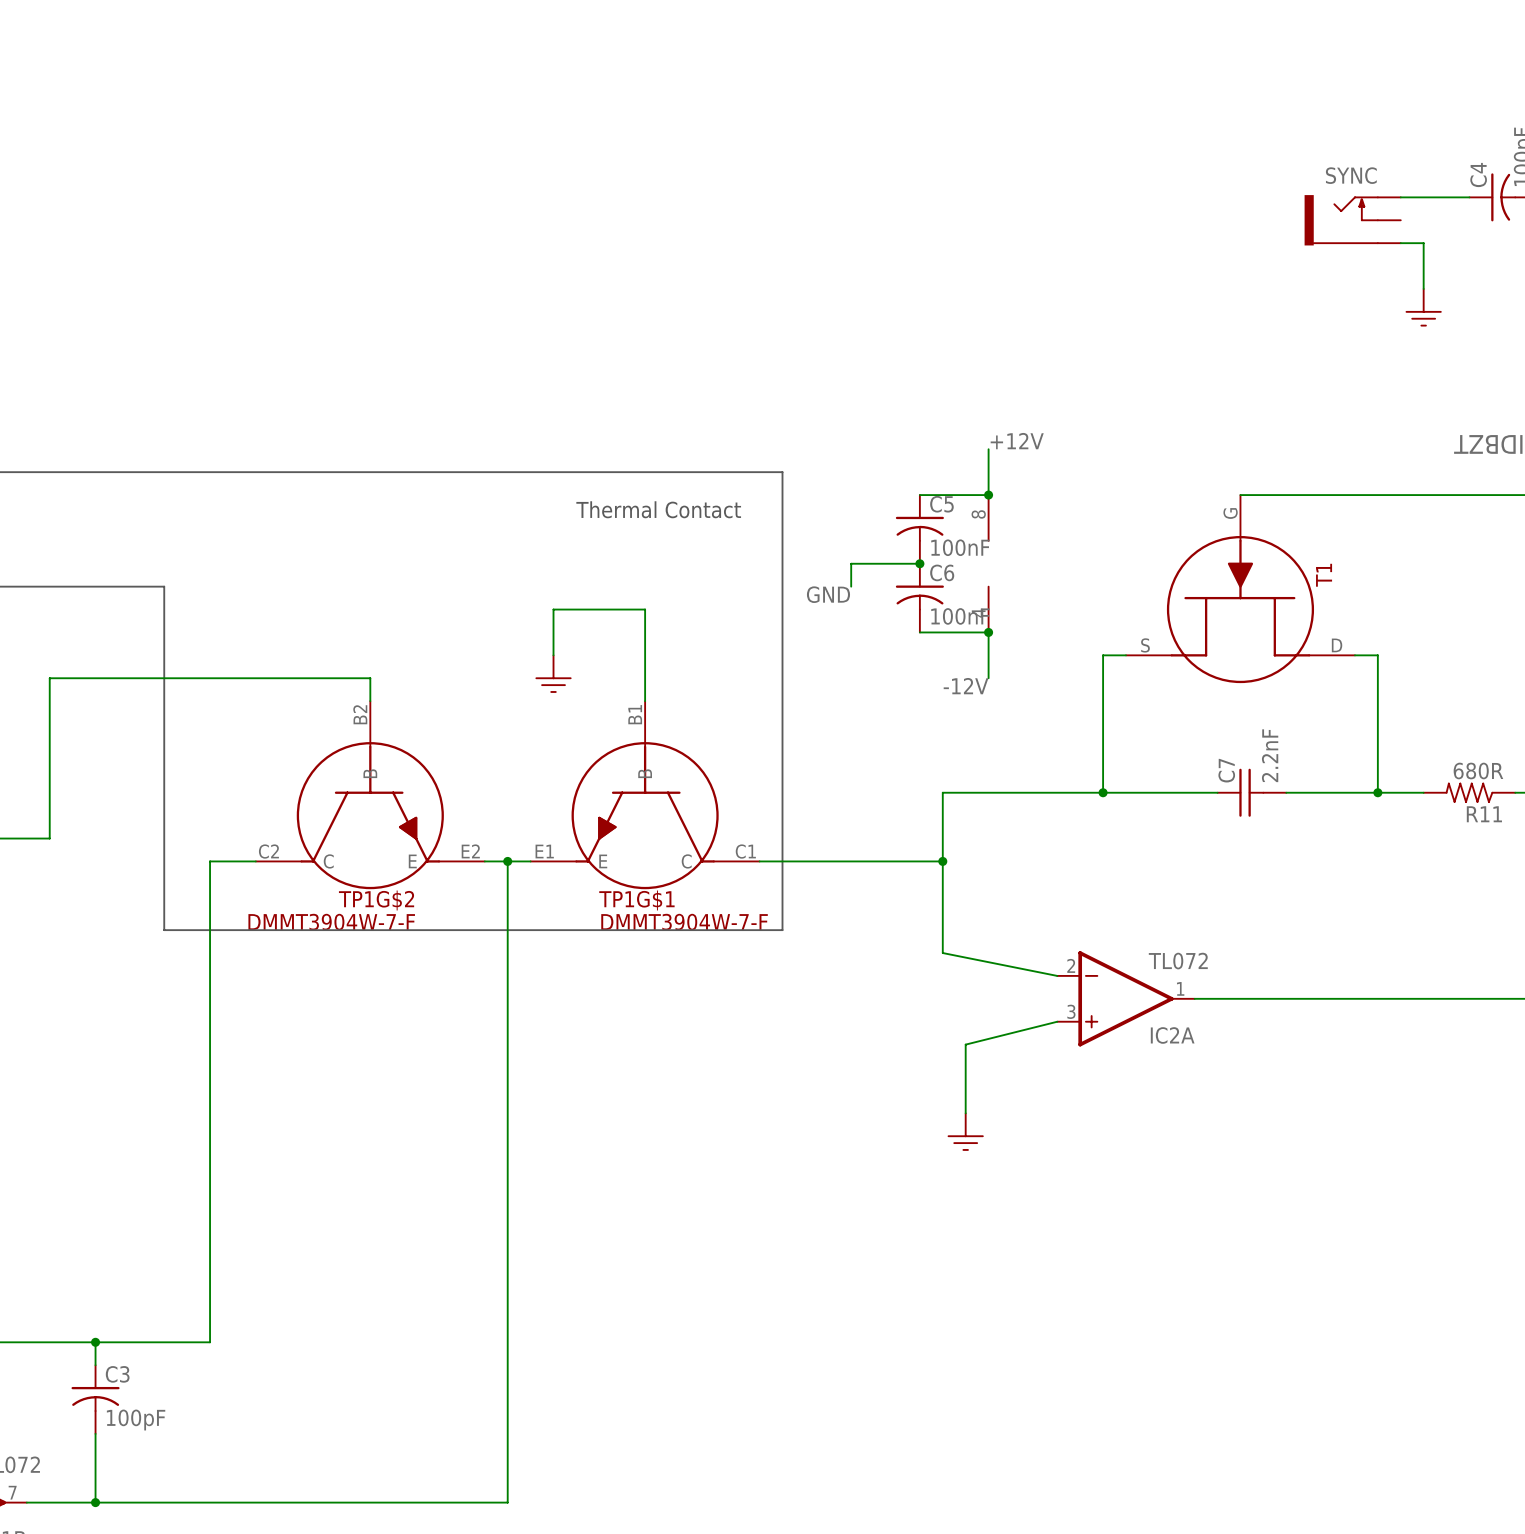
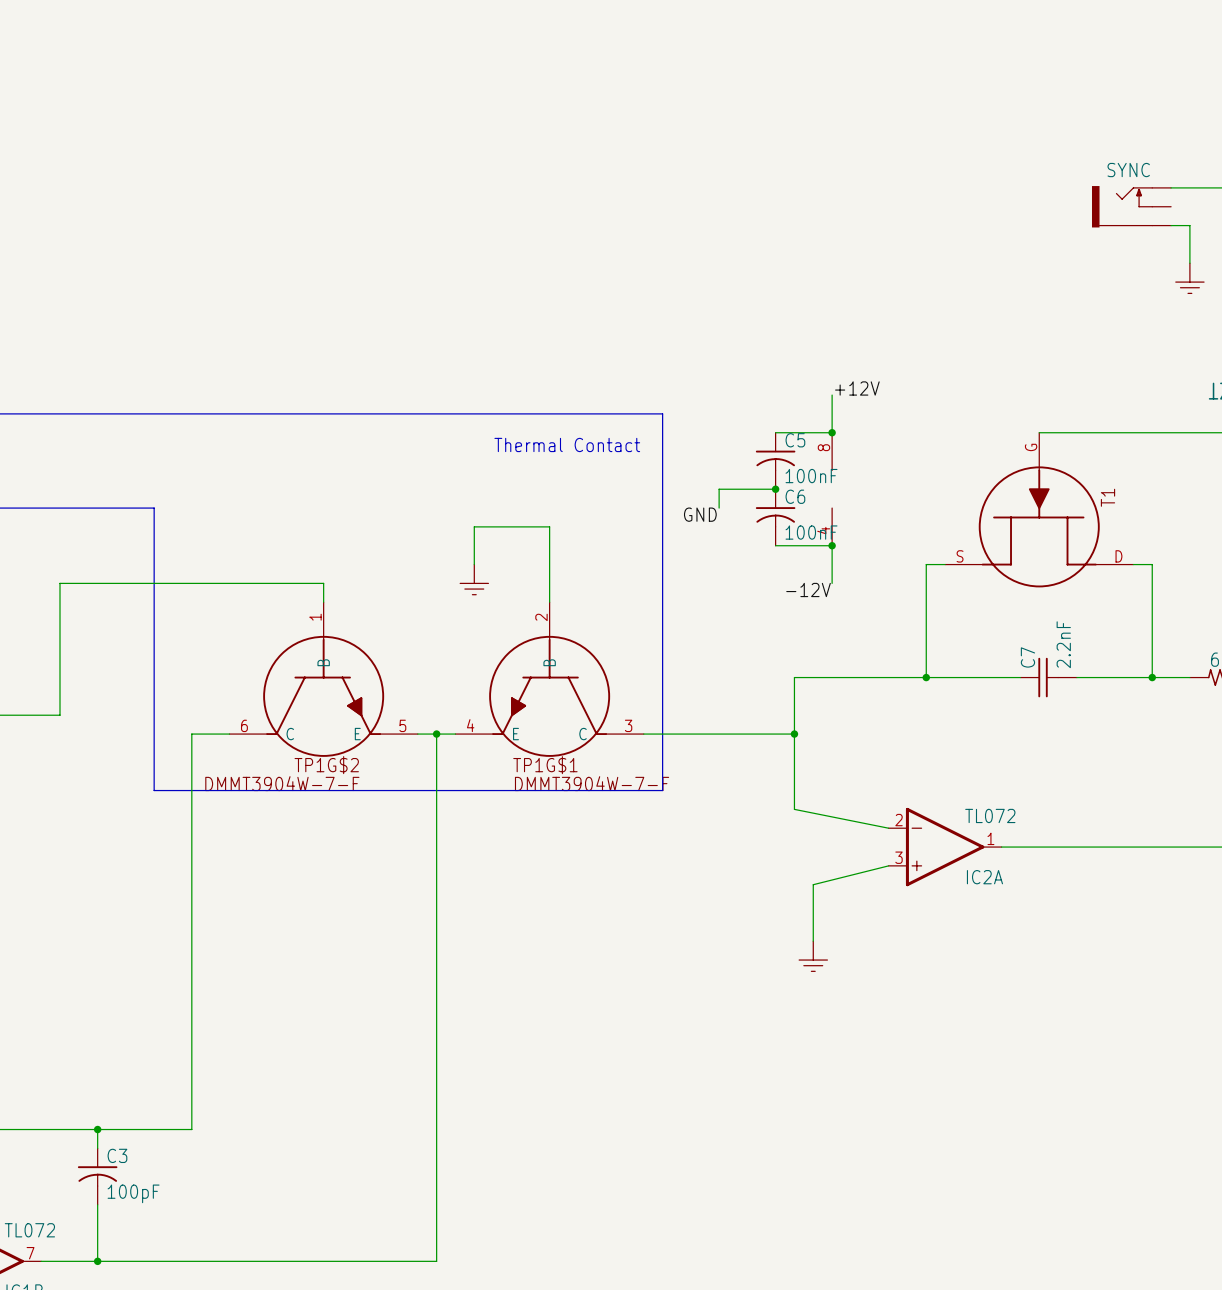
TP1G$2 pin number: B2 (360, 714) -> 1 (315, 617)
TP1G$1 pin number: B1 (635, 714) -> 2 (541, 617)
TP1G$2 pin number: C2 (268, 851) -> 6 (244, 725)
TP1G$2 pin number: E2 (470, 851) -> 5 (402, 725)
TP1G$1 pin number: E1 (544, 851) -> 4 (470, 725)
TP1G$1 pin number: C1 (745, 851) -> 3 (628, 725)

